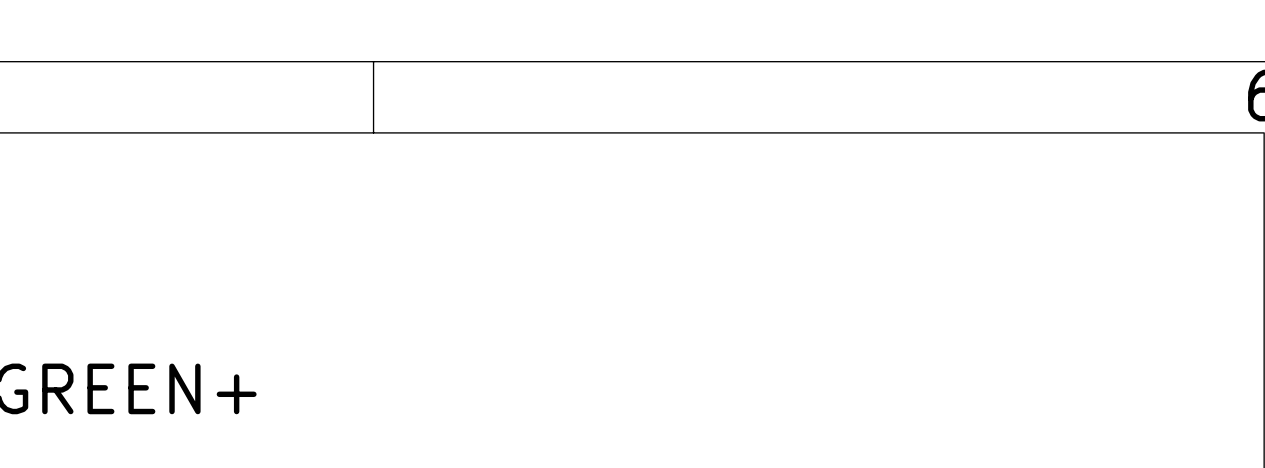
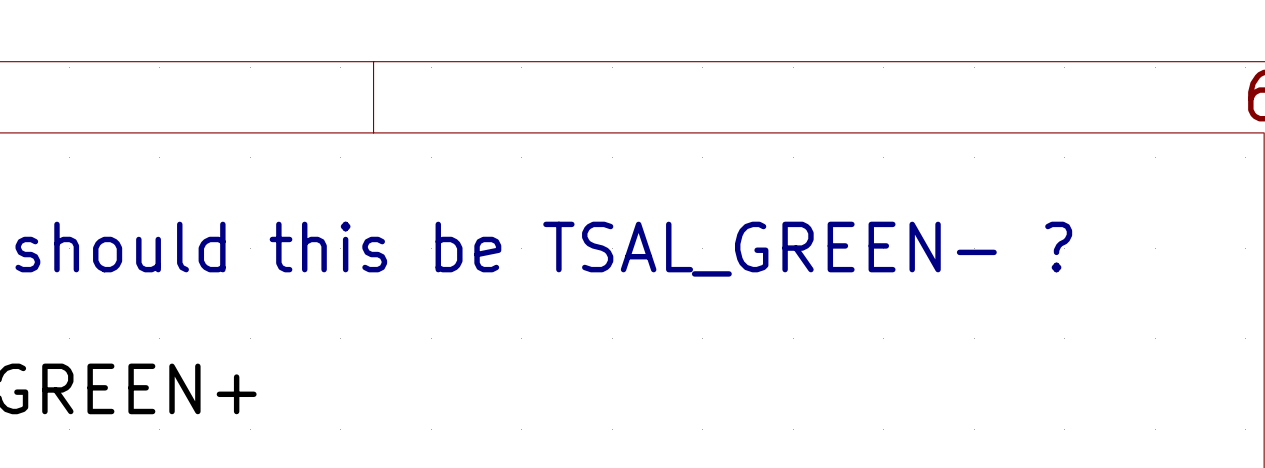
text: none -> should this be TSAL_GREEN- ? (543, 249)

